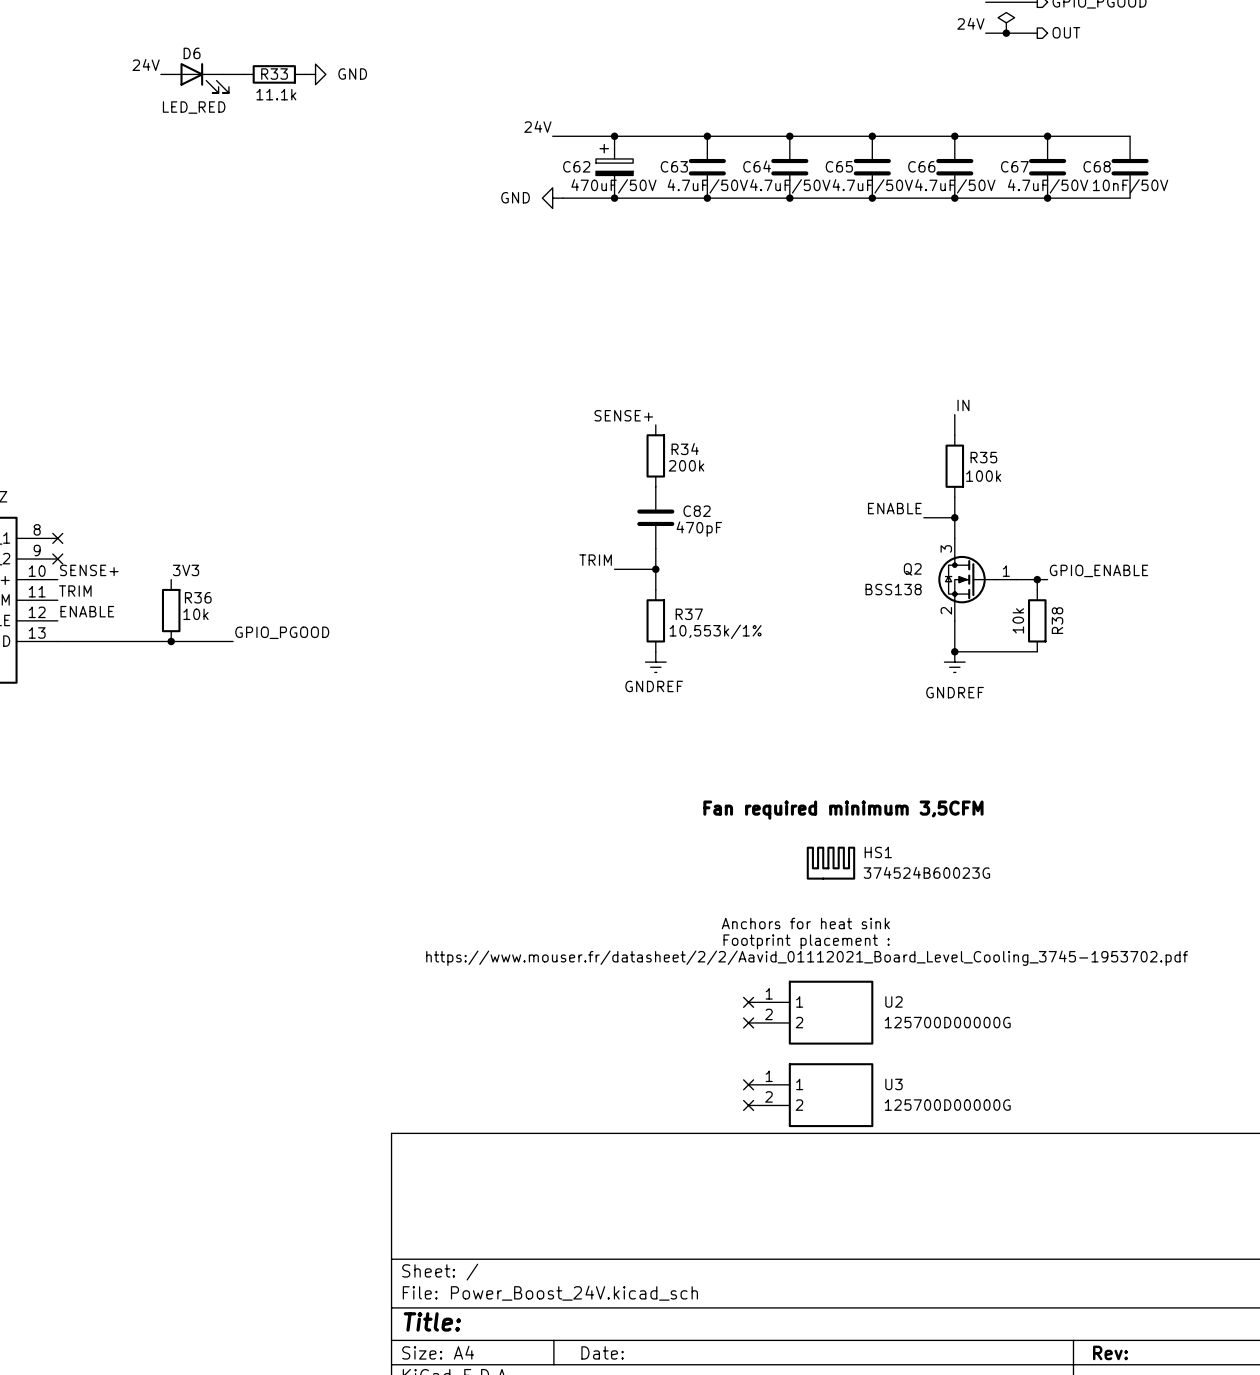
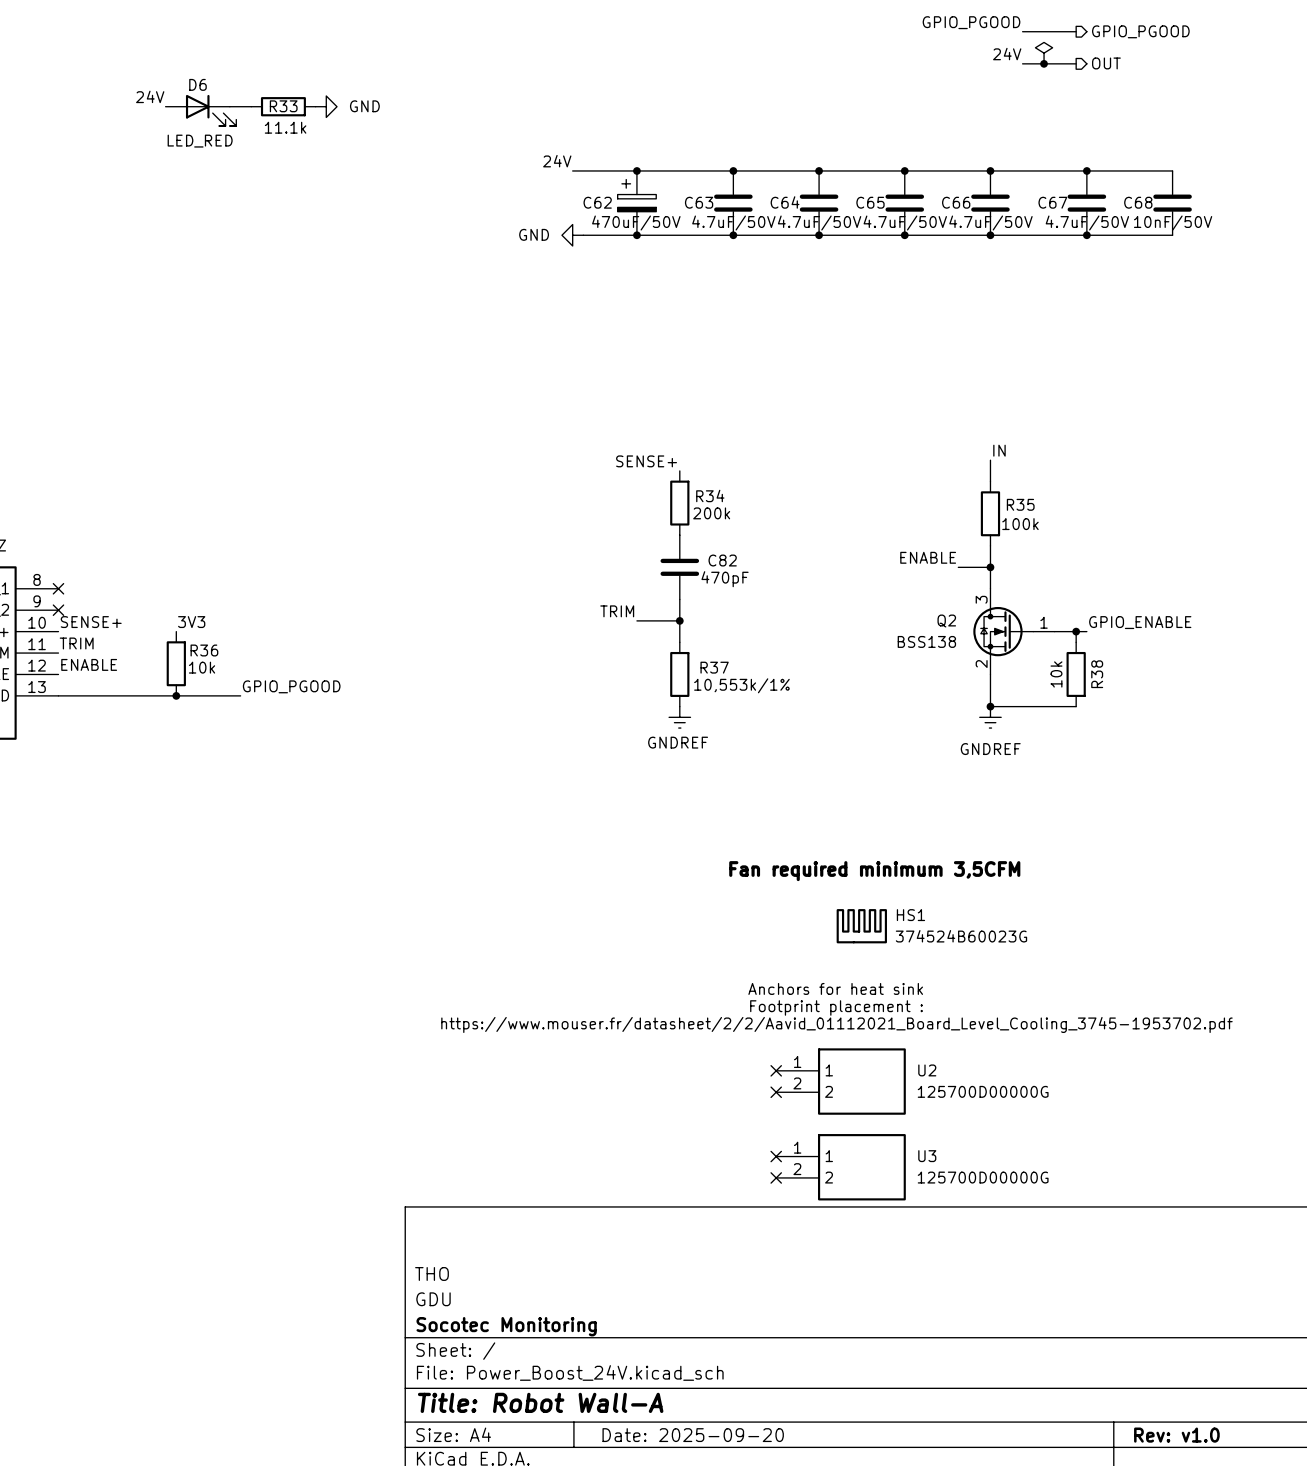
title block: none -> THO (431, 1273)
title block: none -> GDU (433, 1299)
title block: none -> Socotec Monitoring (506, 1326)
title block: Title: (432, 1321) -> Title: Robot Wall-A (540, 1402)
title block: Date: (602, 1352) -> Date: 2025-09-20 (693, 1435)
title block: Rev: (1110, 1352) -> Rev: v1.0 (1176, 1435)

